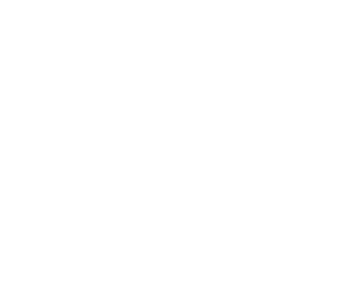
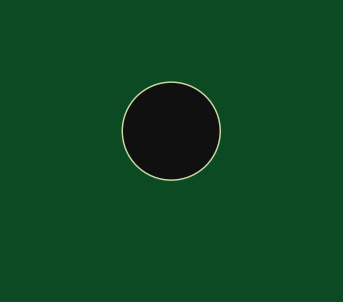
part: none -> (171, 131)

